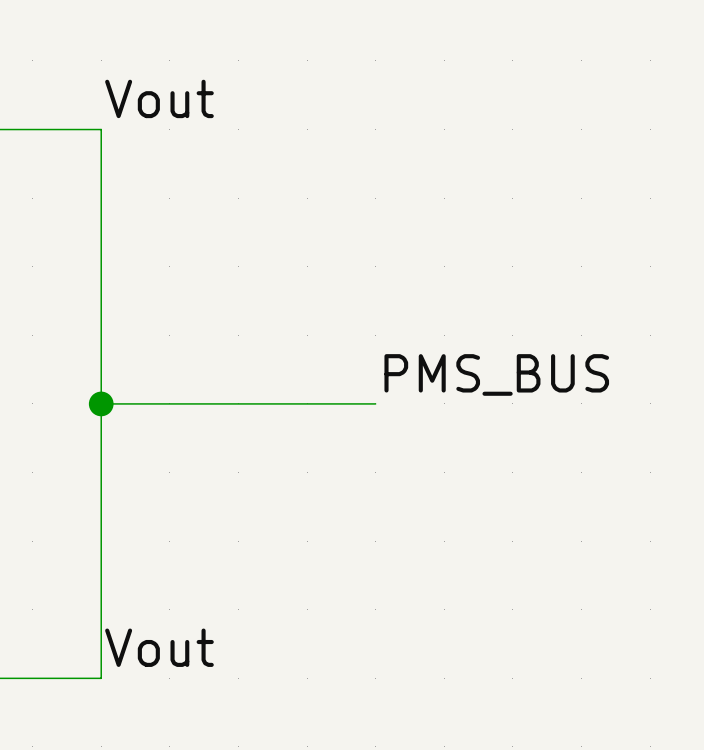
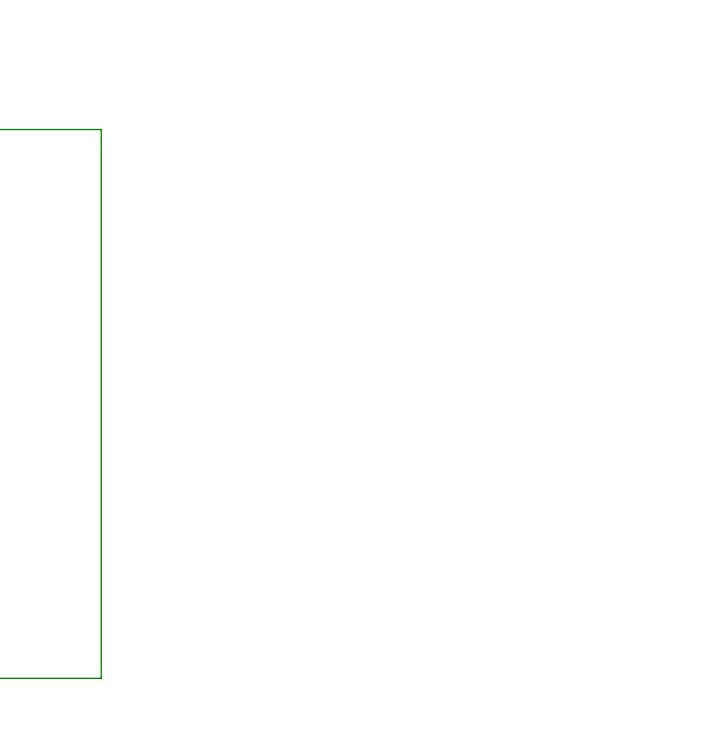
label: Vout (159, 98) -> none
label: PMS_BUS (496, 374) -> none
wire: (101, 403) (375, 403) -> none
junction: (101, 403) -> none
label: Vout (159, 647) -> none

